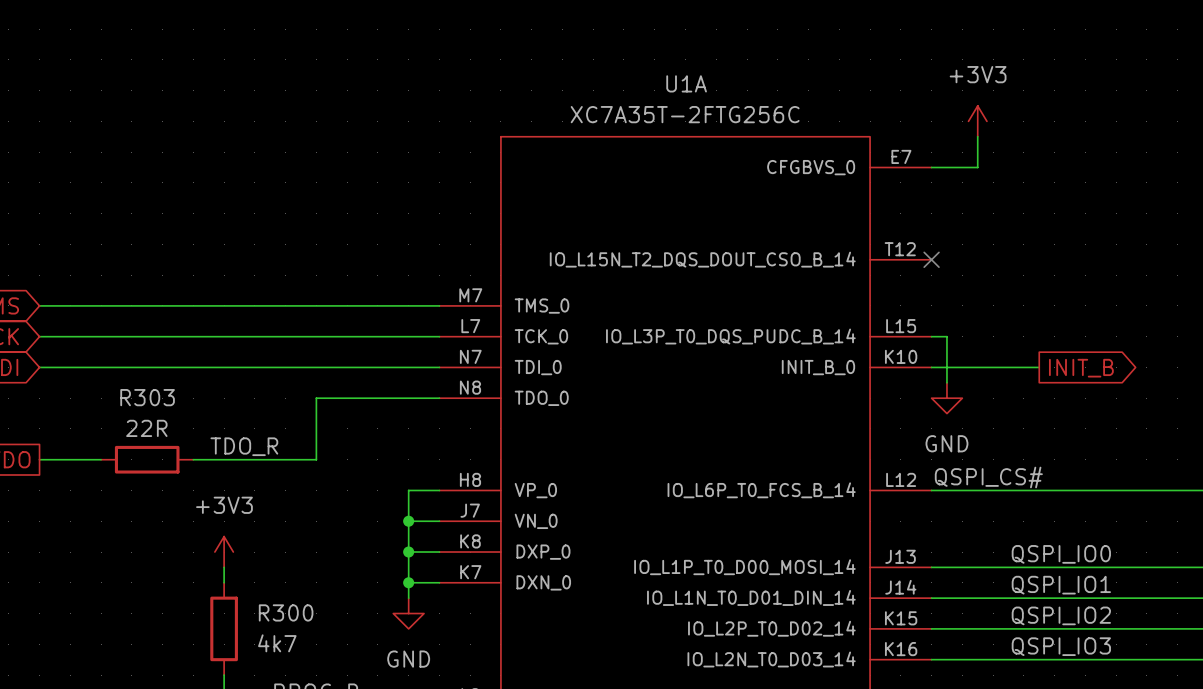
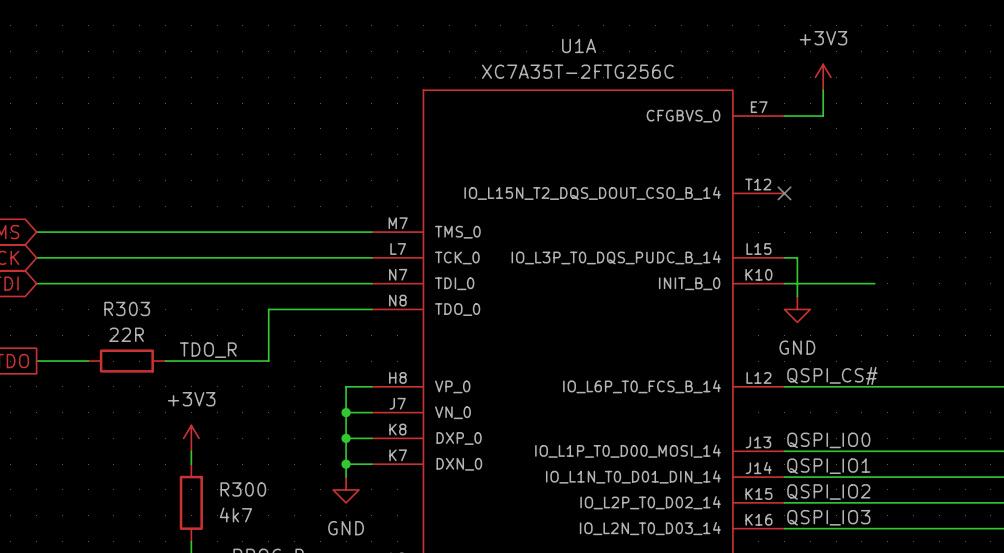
global label: INIT_B (1081, 368) -> none
label position: QSPI_IO0 (1061, 554) -> QSPI_IO0 (828, 440)
label position: QSPI_IO1 (1061, 585) -> QSPI_IO1 (828, 466)
label position: QSPI_IO2 (1061, 615) -> QSPI_IO2 (828, 491)
label position: QSPI_IO3 (1061, 646) -> QSPI_IO3 (828, 517)

